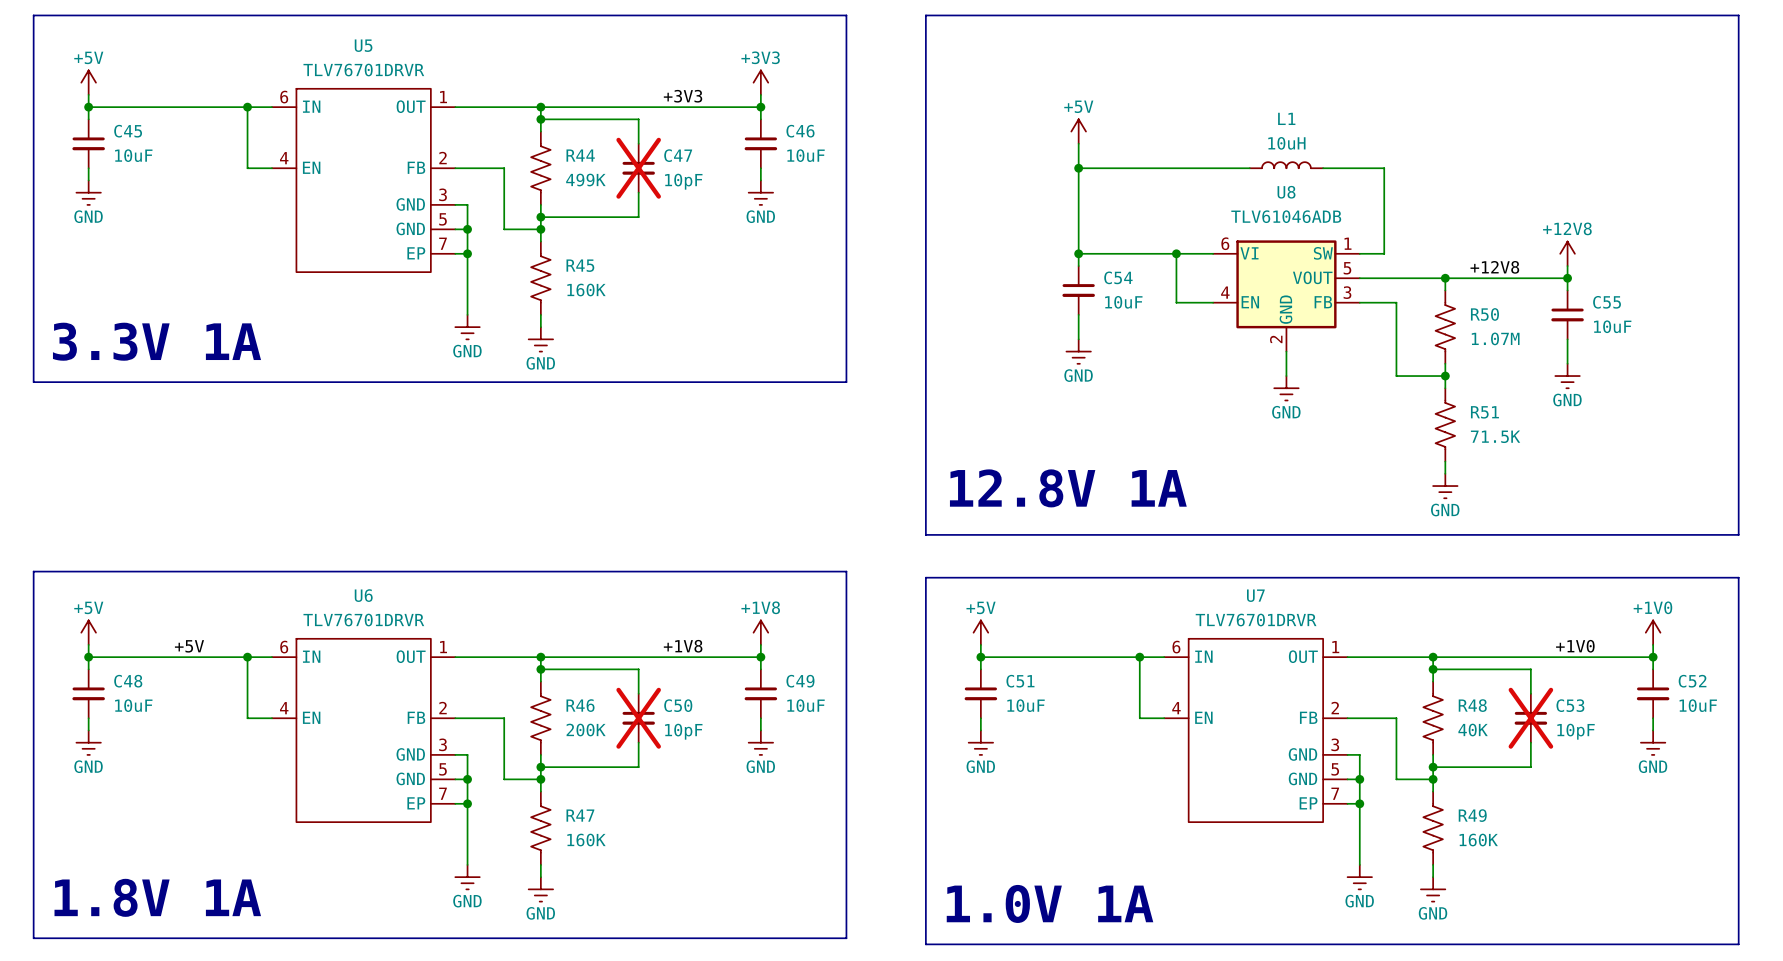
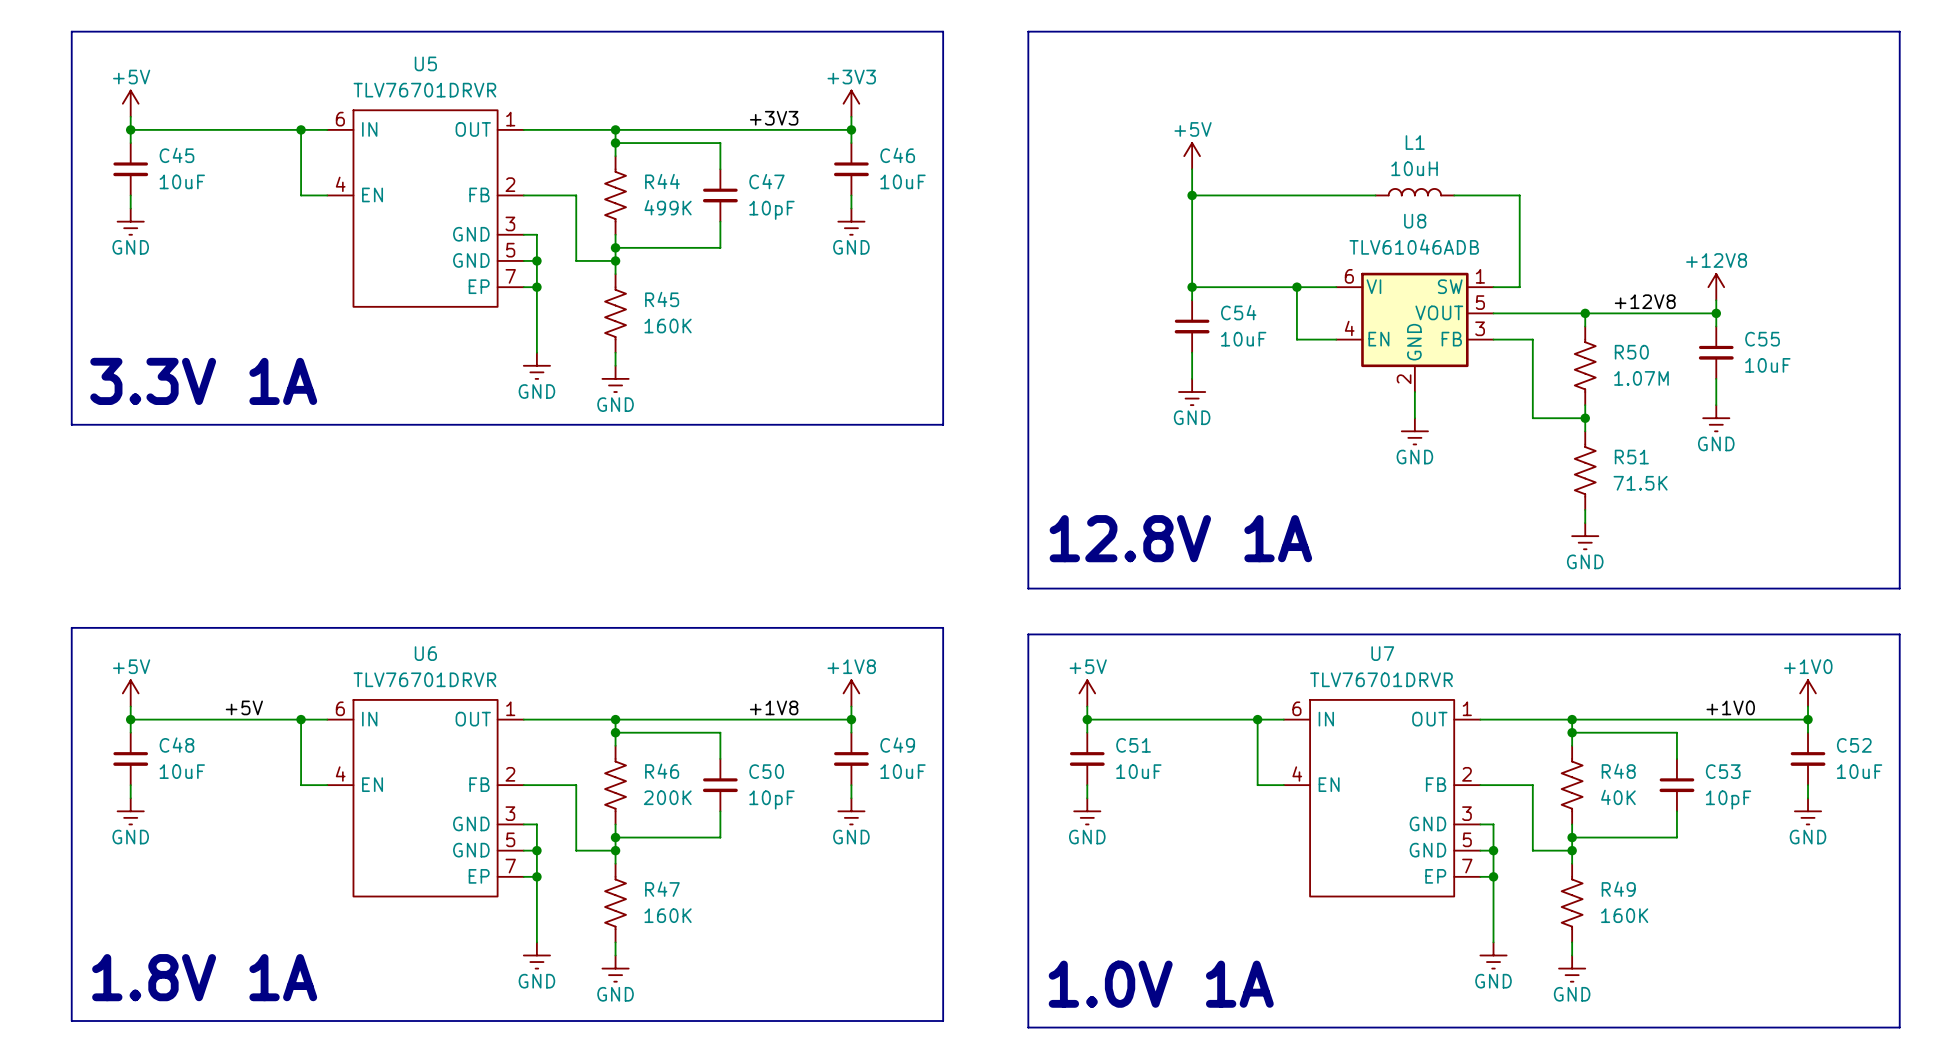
C47 do-not-place cross: (638, 168) -> none
C50 do-not-place cross: (638, 718) -> none
C53 do-not-place cross: (1530, 718) -> none

